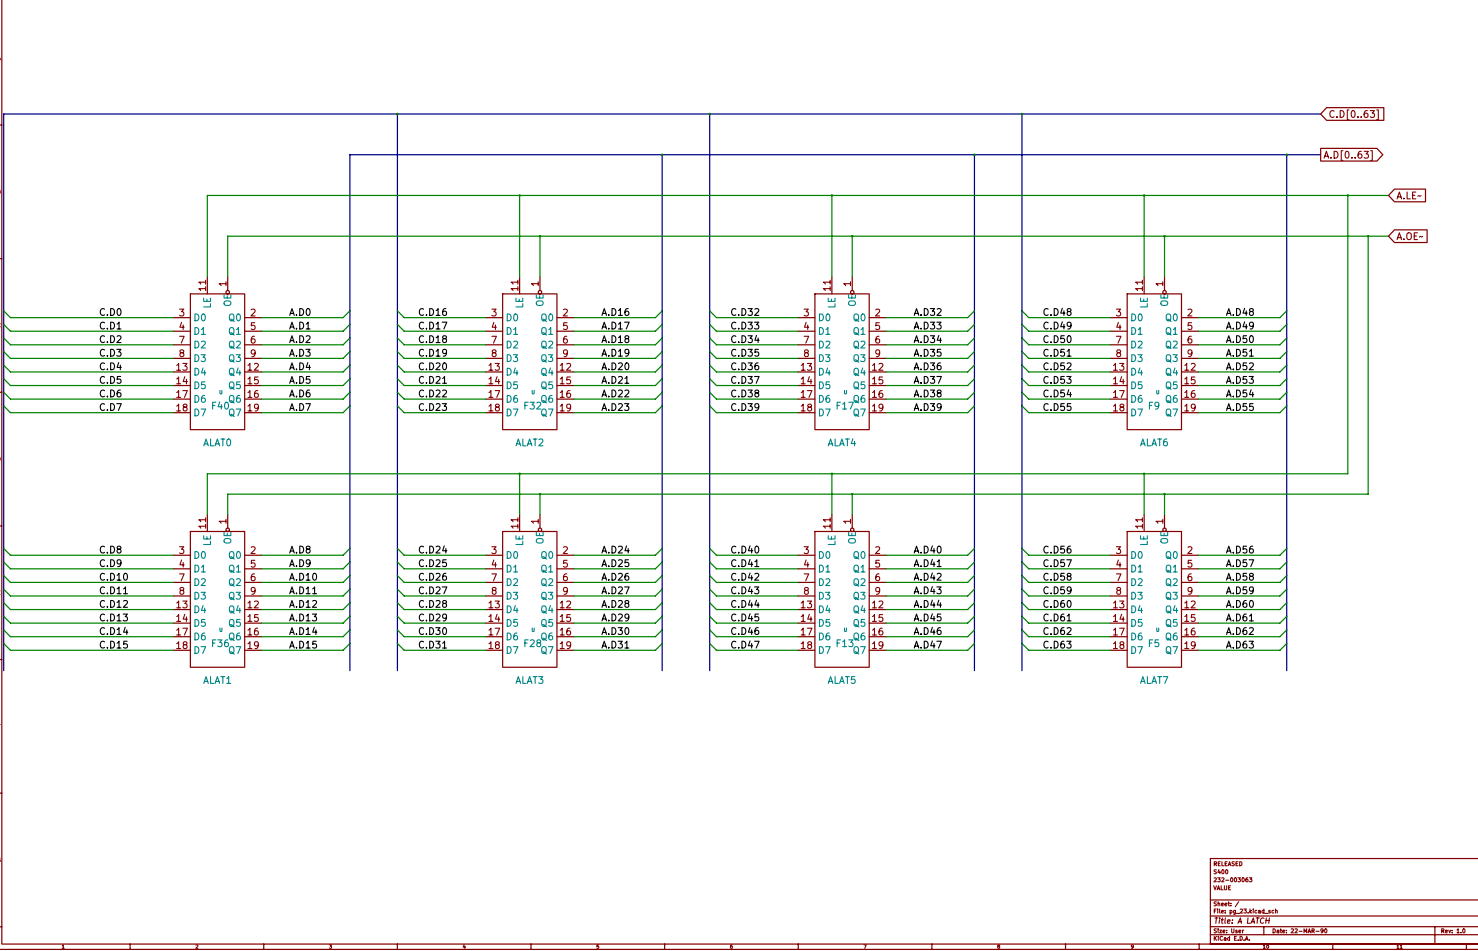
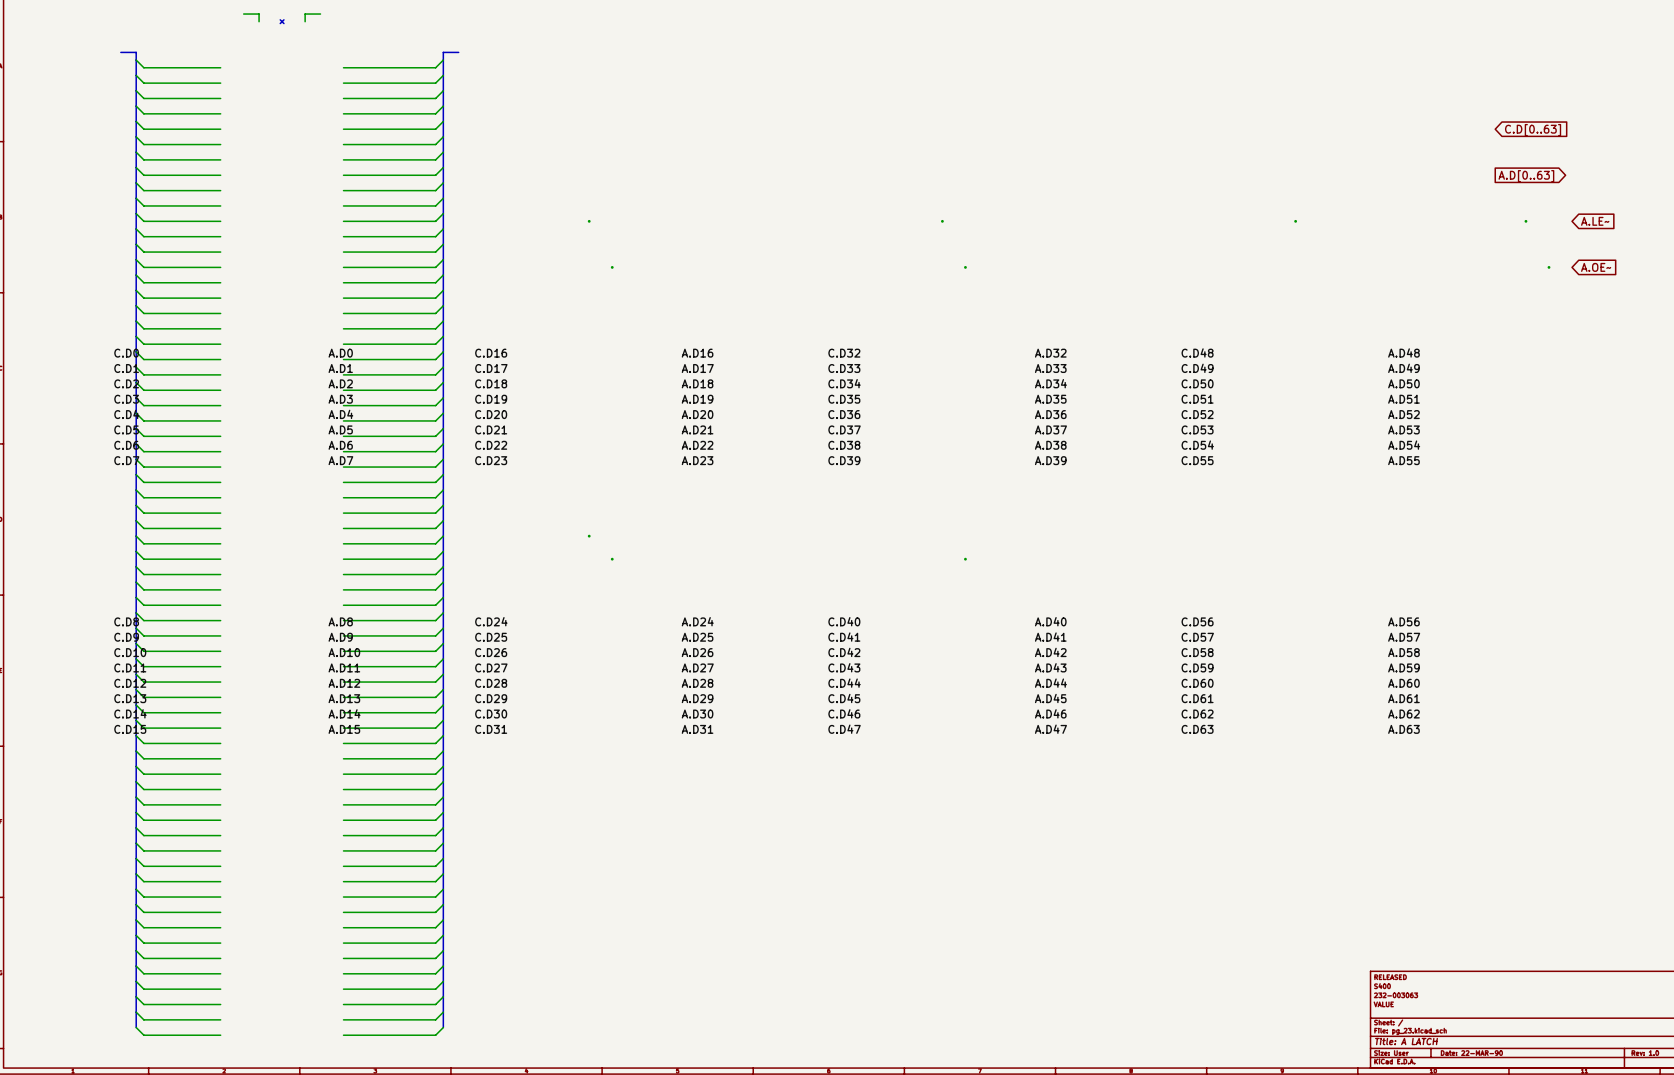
wire: none -> (243, 14) (259, 14) (259, 21)
wire: none -> (320, 14) (305, 14) (305, 21)
no-connect mark: none -> (282, 21)
bus: none -> (120, 52) (136, 52) (136, 1027)
bus: none -> (458, 52) (443, 52) (443, 1027)
wire: none -> (136, 60) (143, 67) (220, 67)
wire: none -> (443, 60) (435, 67) (343, 67)
wire: none -> (136, 75) (143, 83) (220, 83)
wire: none -> (443, 75) (435, 83) (343, 83)
wire: none -> (136, 90) (143, 98) (220, 98)
wire: none -> (443, 90) (435, 98) (343, 98)
wire: none -> (136, 106) (143, 113) (220, 113)
wire: none -> (443, 106) (435, 113) (343, 113)
bus: (397, 113) (397, 670) -> none
junction: (397, 113) -> none
bus: (709, 113) (709, 670) -> none
junction: (709, 113) -> none
bus: (1021, 113) (1021, 670) -> none
junction: (1021, 113) -> none
bus: (1320, 113) (3, 113) (3, 670) -> none
wire: none -> (136, 136) (143, 144) (220, 144)
wire: none -> (443, 136) (435, 144) (343, 144)
wire: none -> (136, 152) (143, 159) (220, 159)
wire: none -> (443, 152) (435, 159) (343, 159)
wire: none -> (136, 167) (143, 175) (220, 175)
wire: none -> (443, 167) (435, 175) (343, 175)
bus: (662, 154) (662, 670) -> none
junction: (662, 154) -> none
bus: (974, 154) (974, 670) -> none
junction: (974, 154) -> none
bus: (1286, 154) (1286, 670) -> none
junction: (1286, 154) -> none
bus: (1320, 154) (349, 154) (349, 670) -> none
wire: none -> (136, 182) (143, 190) (220, 190)
wire: none -> (443, 182) (435, 190) (343, 190)
wire: none -> (136, 198) (143, 205) (220, 205)
wire: none -> (443, 198) (435, 205) (343, 205)
wire: none -> (136, 213) (143, 221) (220, 221)
wire: (302, 195) (207, 195) (207, 276) -> none
wire: (383, 195) (1388, 195) -> (435, 221) (443, 213)
wire: (519, 195) (519, 276) -> none
wire: (831, 195) (831, 276) -> none
wire: (1144, 195) (1144, 276) -> none
wire: (1347, 195) (1347, 473) (207, 473) (207, 514) -> none
wire: none -> (136, 229) (143, 236) (220, 236)
wire: none -> (443, 229) (435, 236) (343, 236)
wire: none -> (136, 244) (143, 252) (220, 252)
wire: none -> (443, 244) (435, 252) (343, 252)
wire: none -> (136, 259) (143, 267) (220, 267)
wire: (302, 236) (227, 236) (227, 276) -> none
wire: (383, 236) (1388, 236) -> (435, 267) (443, 259)
wire: (539, 236) (539, 276) -> none
wire: (852, 236) (852, 276) -> none
wire: (1164, 236) (1164, 276) -> none
wire: (1368, 236) (1368, 494) (383, 494) -> (443, 551) (435, 559)
wire: none -> (136, 275) (143, 282) (220, 282)
wire: none -> (443, 275) (435, 282) (343, 282)
wire: none -> (136, 290) (143, 298) (220, 298)
wire: none -> (443, 290) (435, 298) (343, 298)
wire: none -> (136, 305) (143, 313) (220, 313)
wire: none -> (443, 305) (435, 313) (343, 313)
wire: none -> (136, 321) (143, 328) (220, 328)
wire: none -> (443, 321) (435, 328) (343, 328)
wire: none -> (136, 336) (143, 344) (220, 344)
wire: none -> (443, 336) (435, 344) (343, 344)
wire: (3, 310) (10, 317) (125, 317) -> (136, 351) (143, 359)
wire: (349, 310) (343, 317) -> (443, 351) (435, 359) (389, 359)
wire: (397, 310) (404, 317) (485, 317) -> none
wire: (662, 310) (655, 317) (573, 317) -> none
wire: (709, 310) (716, 317) (797, 317) -> none
wire: (974, 310) (967, 317) (886, 317) -> none
wire: (1021, 310) (1028, 317) (1110, 317) -> none
wire: (1286, 310) (1279, 317) (1198, 317) -> none
wire: (261, 317) (302, 317) -> none
wire: (3, 324) (10, 331) (125, 331) -> (136, 367) (143, 374)
wire: (349, 324) (343, 331) -> (443, 367) (435, 374) (389, 374)
wire: (397, 324) (404, 331) (485, 331) -> none
wire: (662, 324) (655, 331) (573, 331) -> none
wire: (709, 324) (716, 331) (797, 331) -> none
wire: (974, 324) (967, 331) (886, 331) -> none
wire: (1021, 324) (1028, 331) (1110, 331) -> none
wire: (1286, 324) (1279, 331) (1198, 331) -> none
wire: (261, 331) (302, 331) -> none
wire: (3, 338) (10, 344) (125, 344) -> (136, 382) (143, 390)
wire: (349, 338) (343, 344) -> (443, 382) (435, 390) (389, 390)
wire: (397, 338) (404, 344) (485, 344) -> none
wire: (662, 338) (655, 344) (573, 344) -> none
wire: (709, 338) (716, 344) (797, 344) -> none
wire: (974, 338) (967, 344) (886, 344) -> none
wire: (1021, 338) (1028, 344) (1110, 344) -> none
wire: (1286, 338) (1279, 344) (1198, 344) -> none
wire: (261, 344) (302, 344) -> none
wire: (3, 351) (10, 358) (125, 358) -> (136, 397) (143, 405)
wire: (349, 351) (343, 358) -> (443, 397) (435, 405) (389, 405)
wire: (397, 351) (404, 358) (485, 358) -> none
wire: (662, 351) (655, 358) (573, 358) -> none
wire: (709, 351) (716, 358) (797, 358) -> none
wire: (974, 351) (967, 358) (886, 358) -> none
wire: (1021, 351) (1028, 358) (1110, 358) -> none
wire: (1286, 351) (1279, 358) (1198, 358) -> none
part: (217, 353) -> none
part: (529, 353) -> none
part: (842, 353) -> none
part: (1154, 353) -> none
wire: (261, 358) (302, 358) -> none
wire: (3, 365) (10, 371) (125, 371) -> (136, 413) (143, 420)
wire: (349, 365) (343, 371) -> (443, 413) (435, 420) (389, 420)
wire: (397, 365) (404, 371) (485, 371) -> none
wire: (662, 365) (655, 371) (573, 371) -> none
wire: (709, 365) (716, 371) (797, 371) -> none
wire: (974, 365) (967, 371) (886, 371) -> none
wire: (1021, 365) (1028, 371) (1110, 371) -> none
wire: (1286, 365) (1279, 371) (1198, 371) -> none
wire: (261, 371) (302, 371) -> none
wire: (3, 378) (10, 385) (125, 385) -> (136, 428) (143, 436)
wire: (349, 378) (343, 385) -> (443, 428) (435, 436) (389, 436)
wire: (397, 378) (404, 385) (485, 385) -> none
wire: (662, 378) (655, 385) (573, 385) -> none
wire: (709, 378) (716, 385) (797, 385) -> none
wire: (974, 378) (967, 385) (886, 385) -> none
wire: (1021, 378) (1028, 385) (1110, 385) -> none
wire: (1286, 378) (1279, 385) (1198, 385) -> none
wire: (261, 385) (302, 385) -> none
wire: (3, 392) (10, 399) (125, 399) -> (136, 444) (143, 451)
wire: (349, 392) (343, 399) -> (443, 444) (435, 451) (389, 451)
wire: (397, 392) (404, 399) (485, 399) -> none
wire: (662, 392) (655, 399) (573, 399) -> none
wire: (709, 392) (716, 399) (797, 399) -> none
wire: (974, 392) (967, 399) (886, 399) -> none
wire: (1021, 392) (1028, 399) (1110, 399) -> none
wire: (1286, 392) (1279, 399) (1198, 399) -> none
wire: (261, 399) (302, 399) -> none
wire: (3, 405) (10, 412) (125, 412) -> (136, 459) (143, 467)
wire: (349, 405) (343, 412) -> (443, 459) (435, 467) (389, 467)
wire: (397, 405) (404, 412) (485, 412) -> none
wire: (662, 405) (655, 412) (573, 412) -> none
wire: (709, 405) (716, 412) (797, 412) -> none
wire: (974, 405) (967, 412) (886, 412) -> none
wire: (1021, 405) (1028, 412) (1110, 412) -> none
wire: (1286, 405) (1279, 412) (1198, 412) -> none
wire: (261, 412) (302, 412) -> none
wire: none -> (136, 474) (143, 482) (220, 482)
wire: none -> (443, 474) (435, 482) (343, 482)
wire: none -> (136, 490) (143, 497) (220, 497)
wire: none -> (443, 490) (435, 497) (343, 497)
wire: none -> (136, 505) (143, 513) (220, 513)
wire: none -> (443, 505) (435, 513) (343, 513)
wire: none -> (136, 520) (143, 528) (220, 528)
wire: none -> (443, 520) (435, 528) (343, 528)
wire: none -> (136, 536) (143, 543) (220, 543)
wire: none -> (443, 536) (435, 543) (343, 543)
wire: (519, 473) (519, 514) -> none
wire: (831, 473) (831, 514) -> none
wire: (1144, 473) (1144, 514) -> none
wire: none -> (136, 551) (143, 559) (220, 559)
wire: (302, 494) (227, 494) (227, 514) -> none
wire: (539, 494) (539, 514) -> none
wire: (852, 494) (852, 514) -> none
wire: (1164, 494) (1164, 514) -> none
wire: none -> (136, 566) (143, 574) (220, 574)
wire: none -> (443, 566) (435, 574) (343, 574)
wire: none -> (136, 582) (143, 589) (220, 589)
wire: none -> (443, 582) (435, 589) (343, 589)
wire: none -> (136, 597) (143, 605) (220, 605)
wire: none -> (443, 597) (435, 605) (343, 605)
wire: none -> (136, 612) (143, 620) (220, 620)
wire: (3, 548) (10, 555) (173, 555) -> none
wire: (349, 548) (343, 555) (261, 555) -> (443, 612) (435, 620) (343, 620)
wire: (397, 548) (404, 555) (485, 555) -> none
wire: (662, 548) (655, 555) (573, 555) -> none
wire: (709, 548) (716, 555) (797, 555) -> none
wire: (974, 548) (967, 555) (886, 555) -> none
wire: (1021, 548) (1028, 555) (1110, 555) -> none
wire: (1286, 548) (1279, 555) (1198, 555) -> none
wire: none -> (136, 628) (143, 635) (220, 635)
wire: none -> (443, 628) (435, 635) (343, 635)
wire: (3, 562) (10, 568) (173, 568) -> none
wire: (349, 562) (343, 568) (261, 568) -> (443, 643) (435, 651) (343, 651)
wire: (397, 562) (404, 568) (485, 568) -> none
wire: (662, 562) (655, 568) (573, 568) -> none
wire: (709, 562) (716, 568) (797, 568) -> none
wire: (974, 562) (967, 568) (886, 568) -> none
wire: (1021, 562) (1028, 568) (1110, 568) -> none
wire: (1286, 562) (1279, 568) (1198, 568) -> none
wire: none -> (136, 643) (143, 651) (220, 651)
wire: (3, 575) (10, 582) (173, 582) -> none
wire: (349, 575) (343, 582) (261, 582) -> (443, 658) (435, 666) (343, 666)
wire: (397, 575) (404, 582) (485, 582) -> none
wire: (662, 575) (655, 582) (573, 582) -> none
wire: (709, 575) (716, 582) (797, 582) -> none
wire: (974, 575) (967, 582) (886, 582) -> none
wire: (1021, 575) (1028, 582) (1110, 582) -> none
wire: (1286, 575) (1279, 582) (1198, 582) -> none
wire: none -> (136, 658) (143, 666) (220, 666)
wire: (3, 589) (10, 595) (173, 595) -> none
wire: (349, 589) (343, 595) (261, 595) -> (443, 674) (435, 682) (343, 682)
wire: (397, 589) (404, 595) (485, 595) -> none
wire: (662, 589) (655, 595) (573, 595) -> none
wire: (709, 589) (716, 595) (797, 595) -> none
wire: (974, 589) (967, 595) (886, 595) -> none
wire: (1021, 589) (1028, 595) (1110, 595) -> none
wire: (1286, 589) (1279, 595) (1198, 595) -> none
part: (217, 590) -> none
part: (529, 590) -> none
part: (842, 590) -> none
part: (1154, 590) -> none
wire: none -> (136, 674) (143, 682) (220, 682)
wire: (3, 602) (10, 609) (173, 609) -> none
wire: (349, 602) (343, 609) (261, 609) -> (443, 720) (435, 728) (343, 728)
wire: (397, 602) (404, 609) (485, 609) -> none
wire: (662, 602) (655, 609) (573, 609) -> none
wire: (709, 602) (716, 609) (797, 609) -> none
wire: (974, 602) (967, 609) (886, 609) -> none
wire: (1021, 602) (1028, 609) (1110, 609) -> none
wire: (1286, 602) (1279, 609) (1198, 609) -> none
wire: none -> (136, 689) (143, 697) (220, 697)
wire: (3, 616) (10, 623) (173, 623) -> none
wire: (349, 616) (343, 623) (261, 623) -> (443, 689) (435, 697) (343, 697)
wire: (397, 616) (404, 623) (485, 623) -> none
wire: (662, 616) (655, 623) (573, 623) -> none
wire: (709, 616) (716, 623) (797, 623) -> none
wire: (974, 616) (967, 623) (886, 623) -> none
wire: (1021, 616) (1028, 623) (1110, 623) -> none
wire: (1286, 616) (1279, 623) (1198, 623) -> none
wire: none -> (136, 705) (143, 712) (220, 712)
wire: (3, 629) (10, 636) (173, 636) -> none
wire: (349, 629) (343, 636) (261, 636) -> (443, 705) (435, 712) (343, 712)
wire: (397, 629) (404, 636) (485, 636) -> none
wire: (662, 629) (655, 636) (573, 636) -> none
wire: (709, 629) (716, 636) (797, 636) -> none
wire: (974, 629) (967, 636) (886, 636) -> none
wire: (1021, 629) (1028, 636) (1110, 636) -> none
wire: (1286, 629) (1279, 636) (1198, 636) -> none
wire: none -> (136, 720) (143, 728) (220, 728)
wire: (3, 643) (10, 650) (173, 650) -> none
wire: (349, 643) (343, 650) (261, 650) -> (443, 735) (435, 743) (343, 743)
wire: (397, 643) (404, 650) (485, 650) -> none
wire: (662, 643) (655, 650) (573, 650) -> none
wire: (709, 643) (716, 650) (797, 650) -> none
wire: (974, 643) (967, 650) (886, 650) -> none
wire: (1021, 643) (1028, 650) (1110, 650) -> none
wire: (1286, 643) (1279, 650) (1198, 650) -> none
wire: none -> (136, 735) (143, 743) (220, 743)
wire: none -> (136, 751) (143, 758) (220, 758)
wire: none -> (443, 751) (435, 758) (343, 758)
wire: none -> (136, 766) (143, 774) (220, 774)
wire: none -> (443, 766) (435, 774) (343, 774)
wire: none -> (136, 781) (143, 789) (220, 789)
wire: none -> (443, 781) (435, 789) (343, 789)
wire: none -> (136, 797) (143, 804) (220, 804)
wire: none -> (443, 797) (435, 804) (343, 804)
wire: none -> (136, 812) (143, 820) (220, 820)
wire: none -> (443, 812) (435, 820) (343, 820)
wire: none -> (136, 827) (143, 835) (220, 835)
wire: none -> (443, 827) (435, 835) (343, 835)
wire: none -> (136, 843) (143, 850) (220, 850)
wire: none -> (443, 843) (435, 850) (343, 850)
wire: none -> (136, 858) (143, 866) (220, 866)
wire: none -> (443, 858) (435, 866) (343, 866)
wire: none -> (136, 873) (143, 881) (220, 881)
wire: none -> (443, 873) (435, 881) (343, 881)
wire: none -> (136, 889) (143, 897) (220, 897)
wire: none -> (443, 889) (435, 897) (343, 897)
wire: none -> (136, 904) (143, 912) (220, 912)
wire: none -> (443, 904) (435, 912) (343, 912)
wire: none -> (136, 920) (143, 927) (220, 927)
wire: none -> (443, 920) (435, 927) (343, 927)
wire: none -> (136, 935) (143, 943) (220, 943)
wire: none -> (443, 935) (435, 943) (343, 943)
wire: none -> (136, 950) (143, 958) (220, 958)
wire: none -> (443, 950) (435, 958) (343, 958)
wire: none -> (136, 966) (143, 973) (220, 973)
wire: none -> (443, 966) (435, 973) (343, 973)
wire: none -> (136, 981) (143, 989) (220, 989)
wire: none -> (443, 981) (435, 989) (343, 989)
wire: none -> (136, 996) (143, 1004) (220, 1004)
wire: none -> (443, 996) (435, 1004) (343, 1004)
wire: none -> (136, 1012) (143, 1019) (220, 1019)
wire: none -> (443, 1012) (435, 1019) (343, 1019)
wire: none -> (136, 1027) (143, 1035) (220, 1035)
wire: none -> (443, 1027) (435, 1035) (343, 1035)

